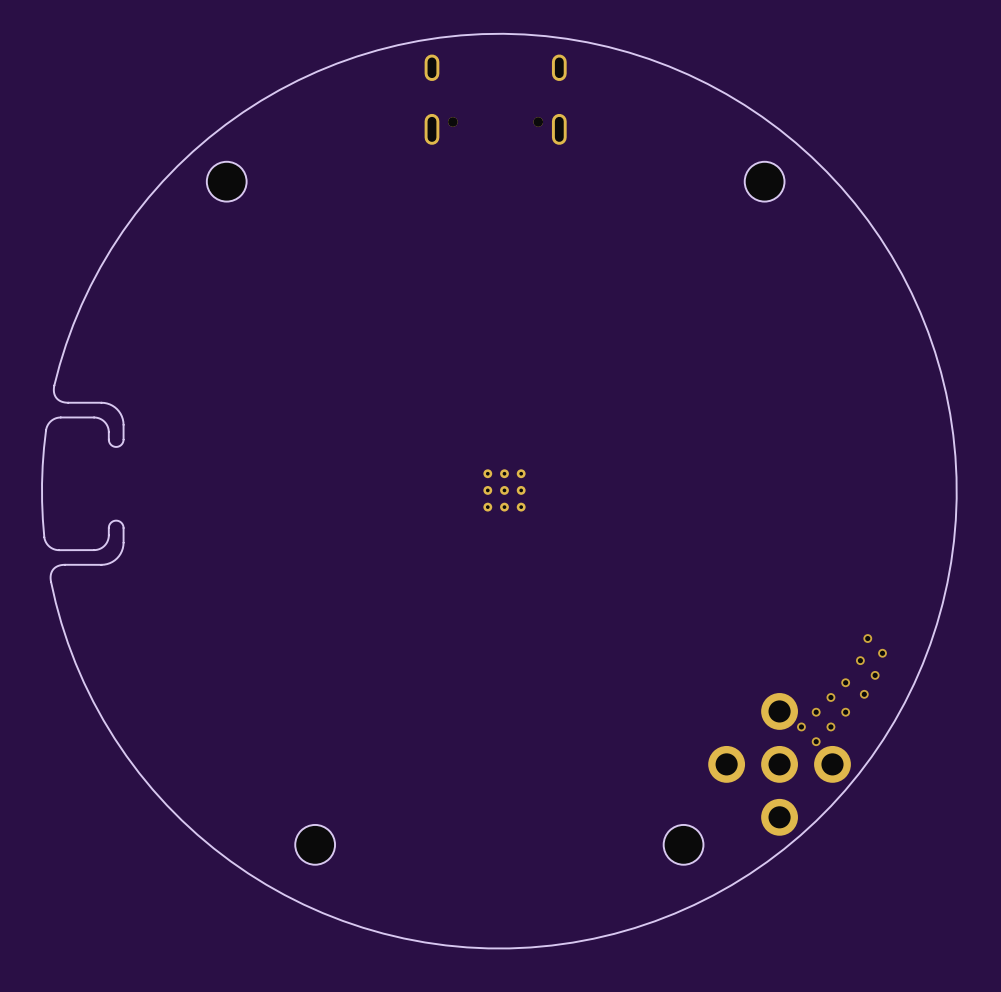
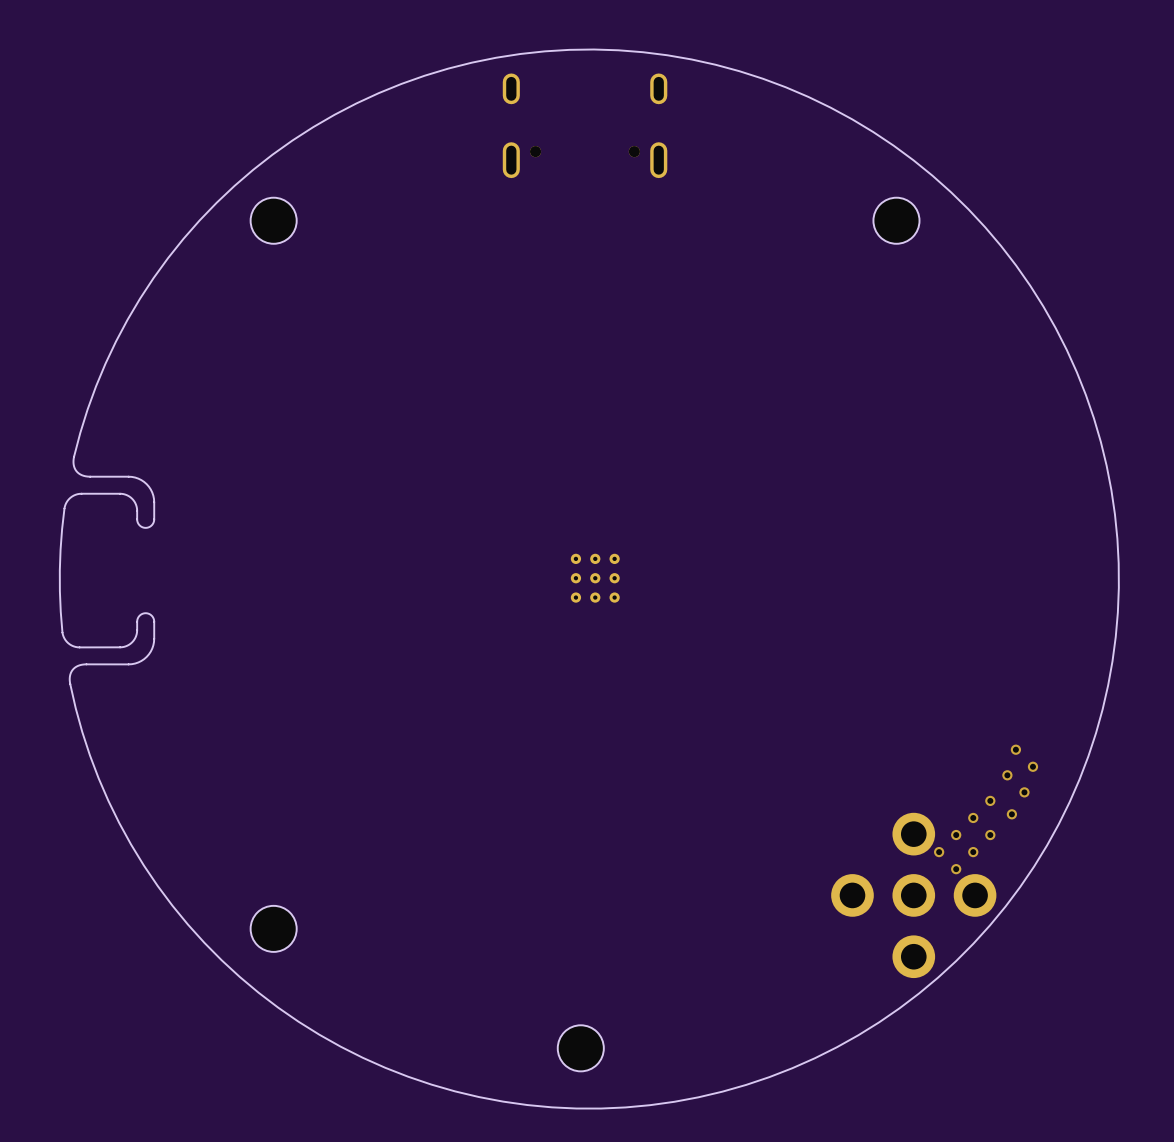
part: none -> (273, 928)
part: (315, 844) -> none
part: (683, 844) -> none
part: none -> (580, 1048)

